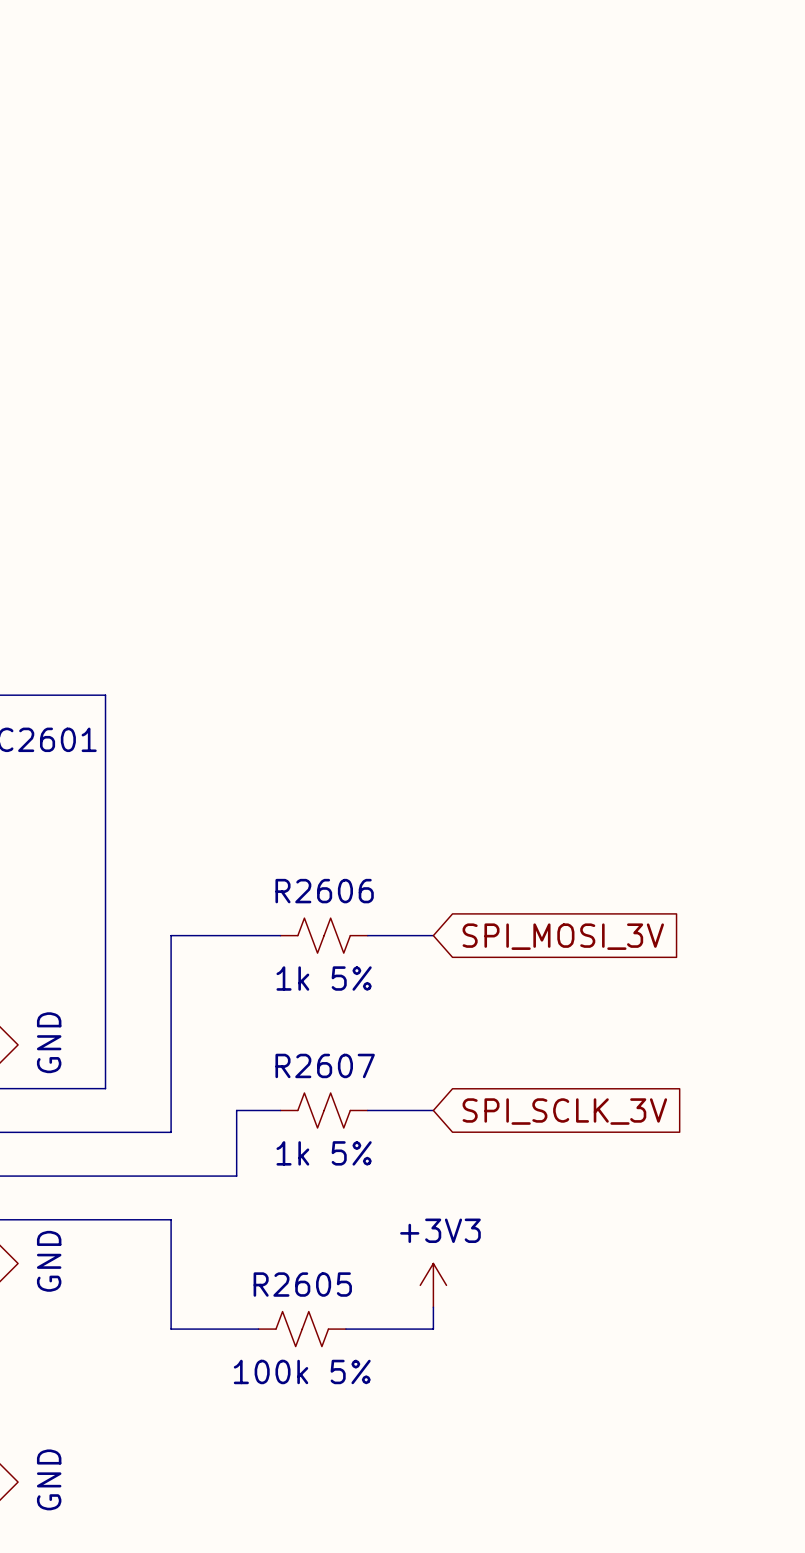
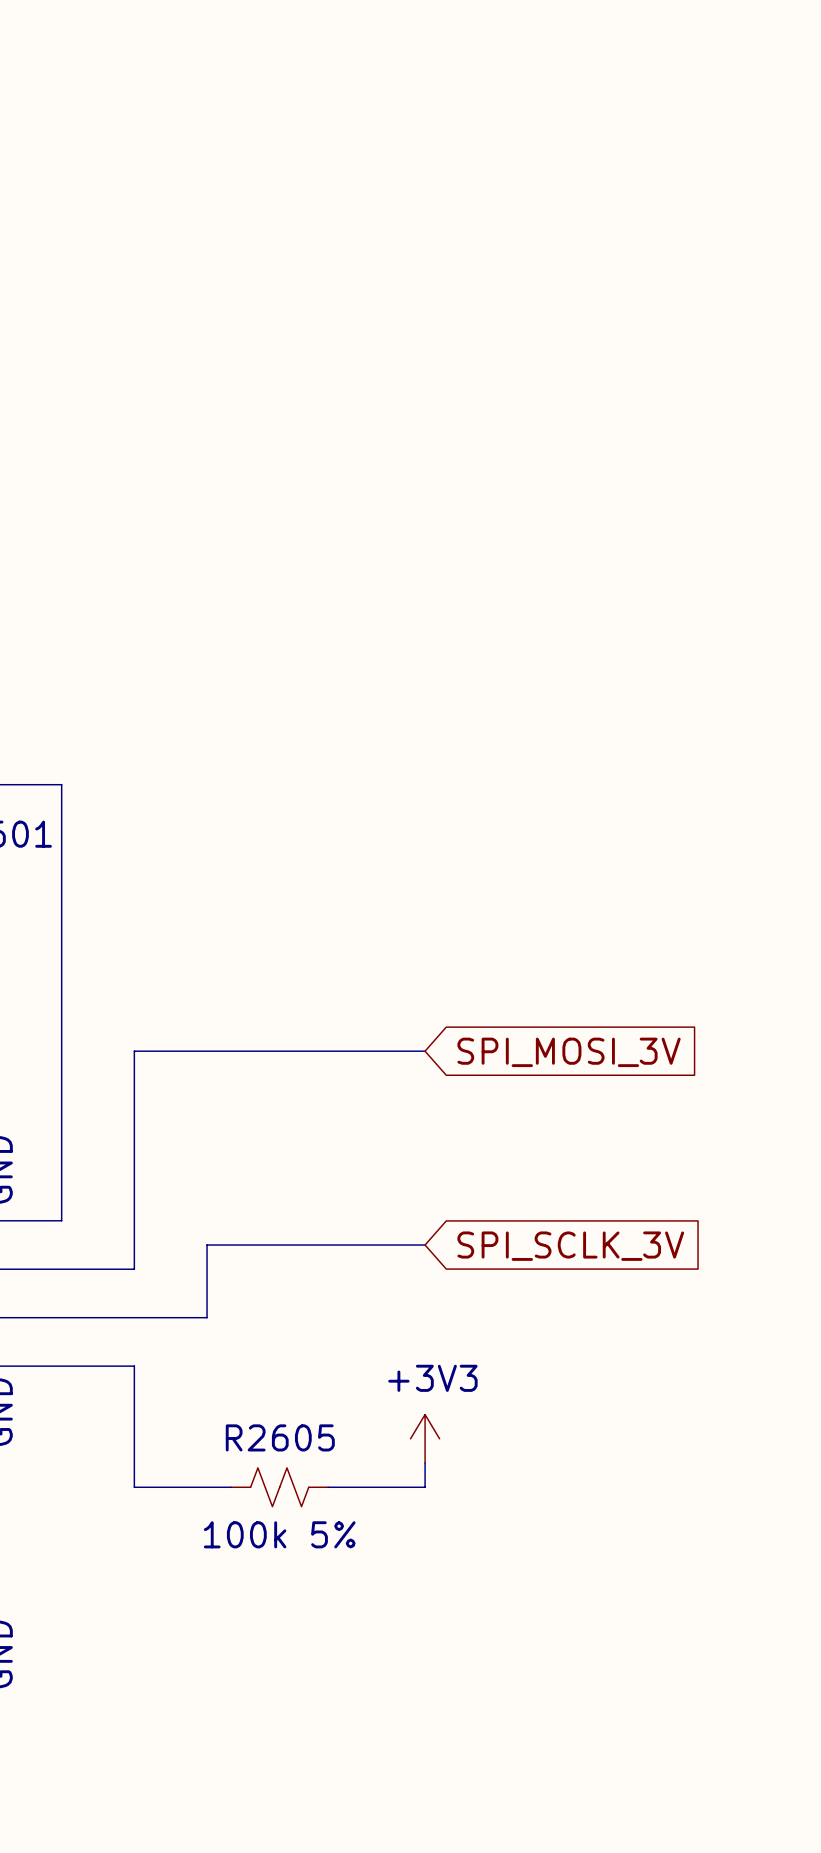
wire: none -> (255, 1051) (352, 1051)
R2606: 1k 5% (324, 935) -> none
wire: none -> (255, 1245) (352, 1245)
R2607: 1k 5% (324, 1110) -> none

